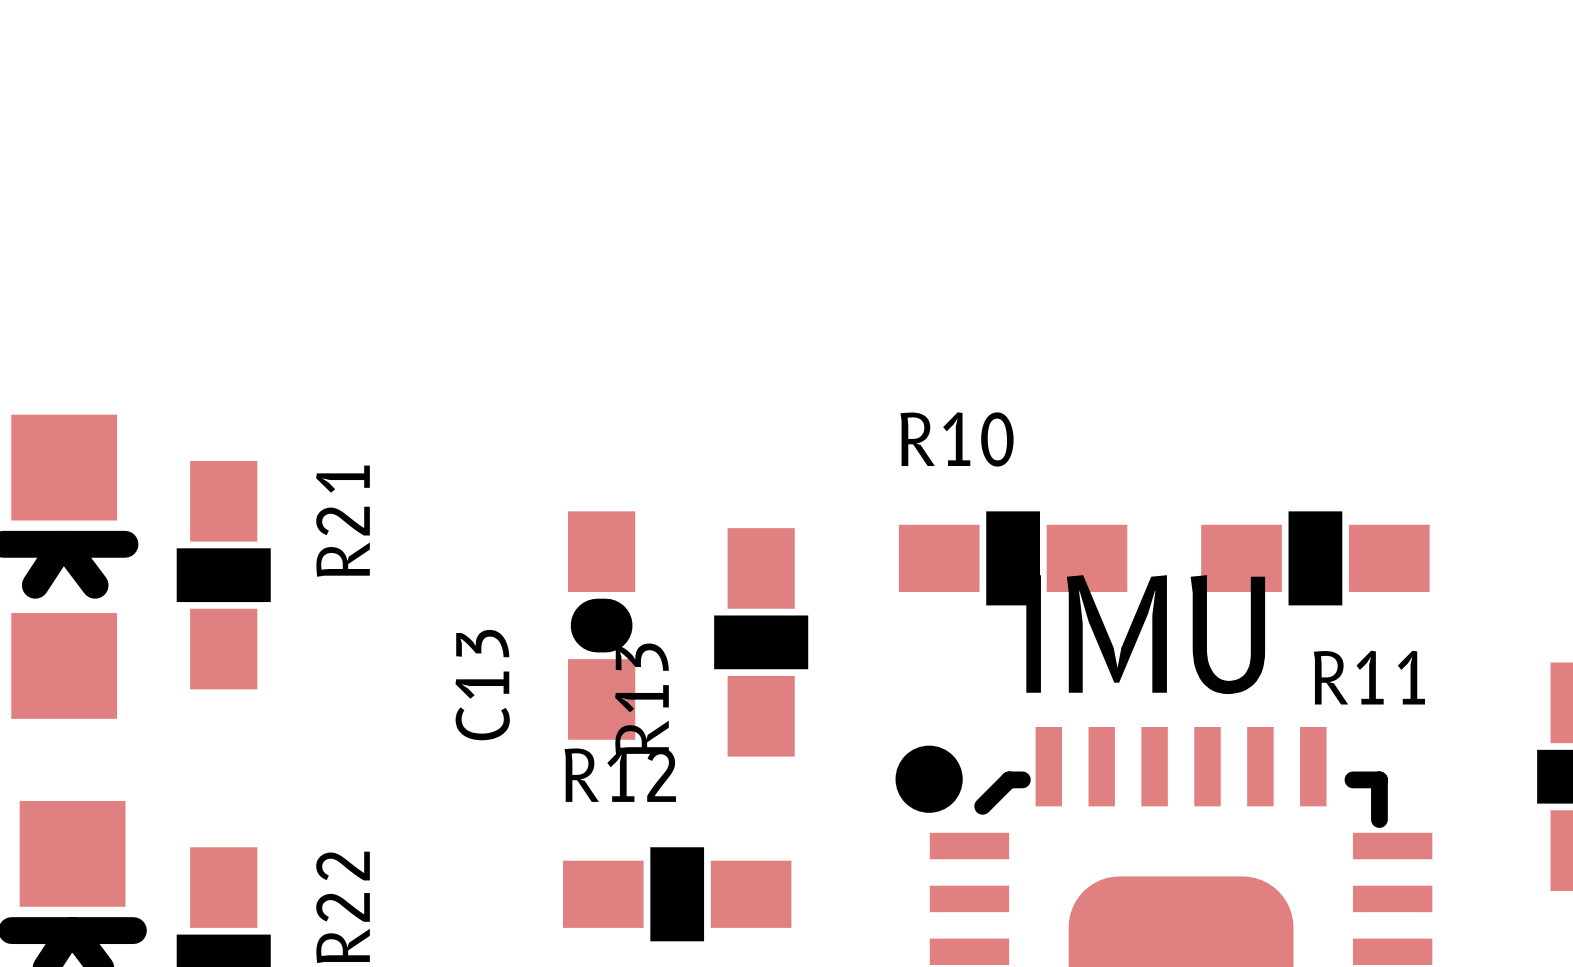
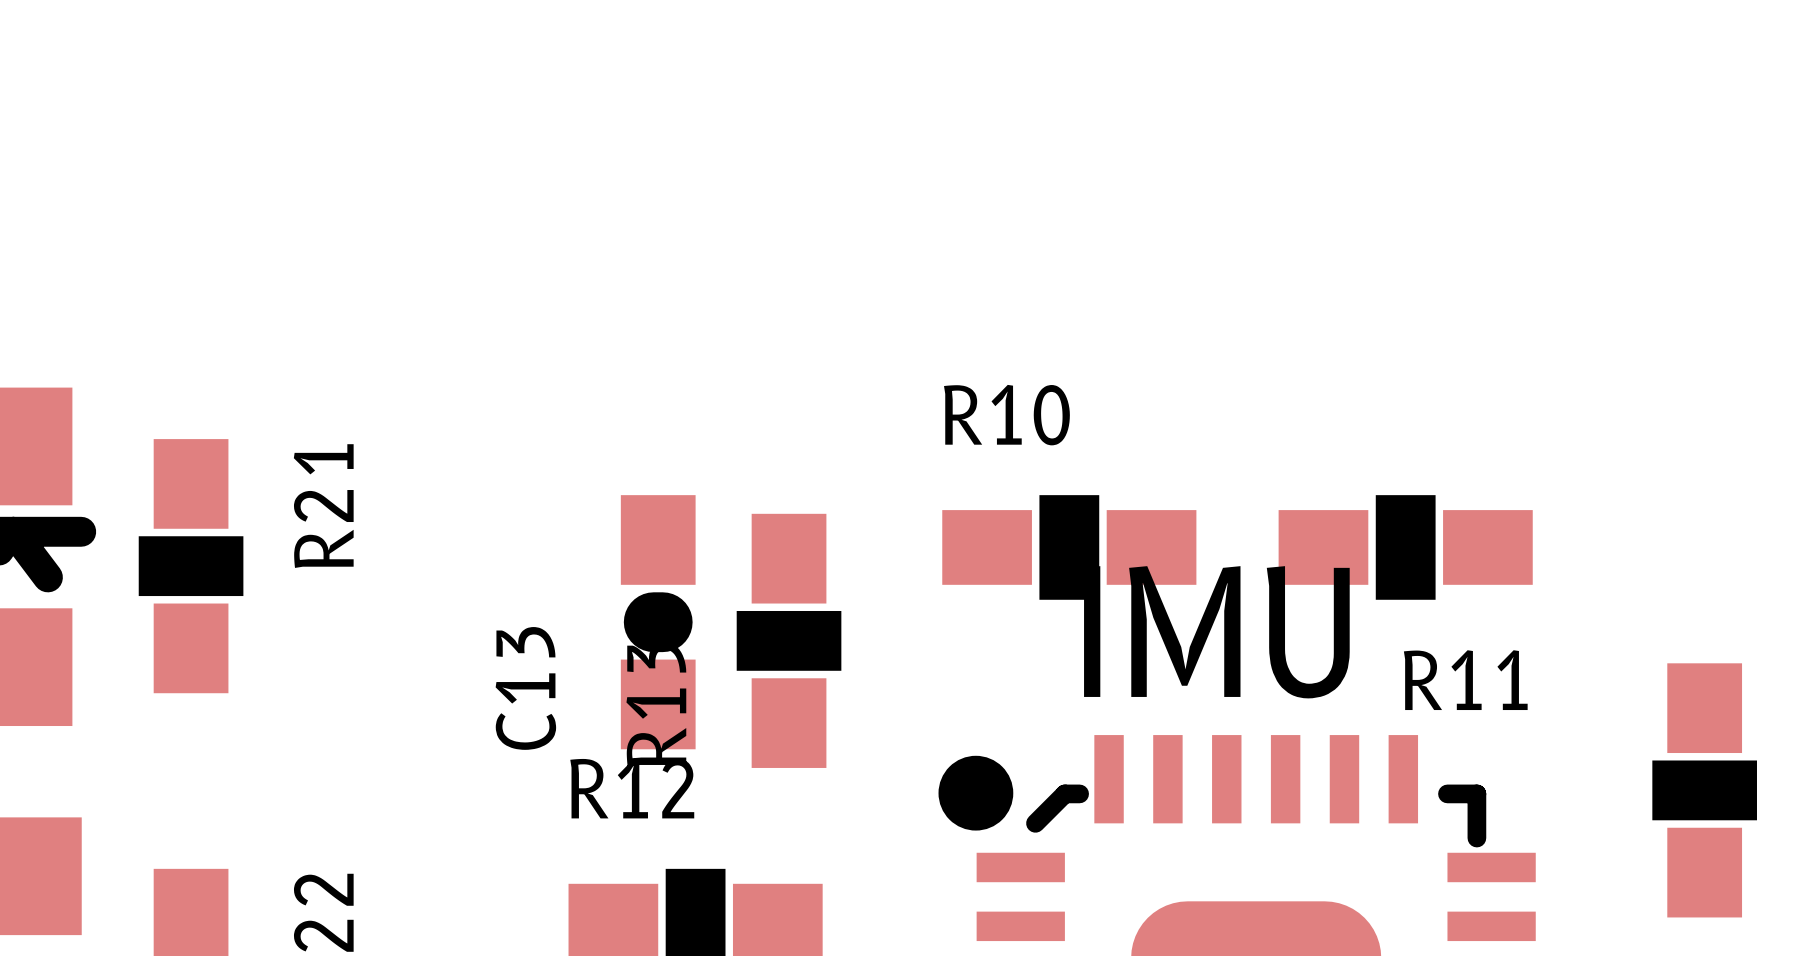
C13 position: (601, 625) -> (658, 622)

